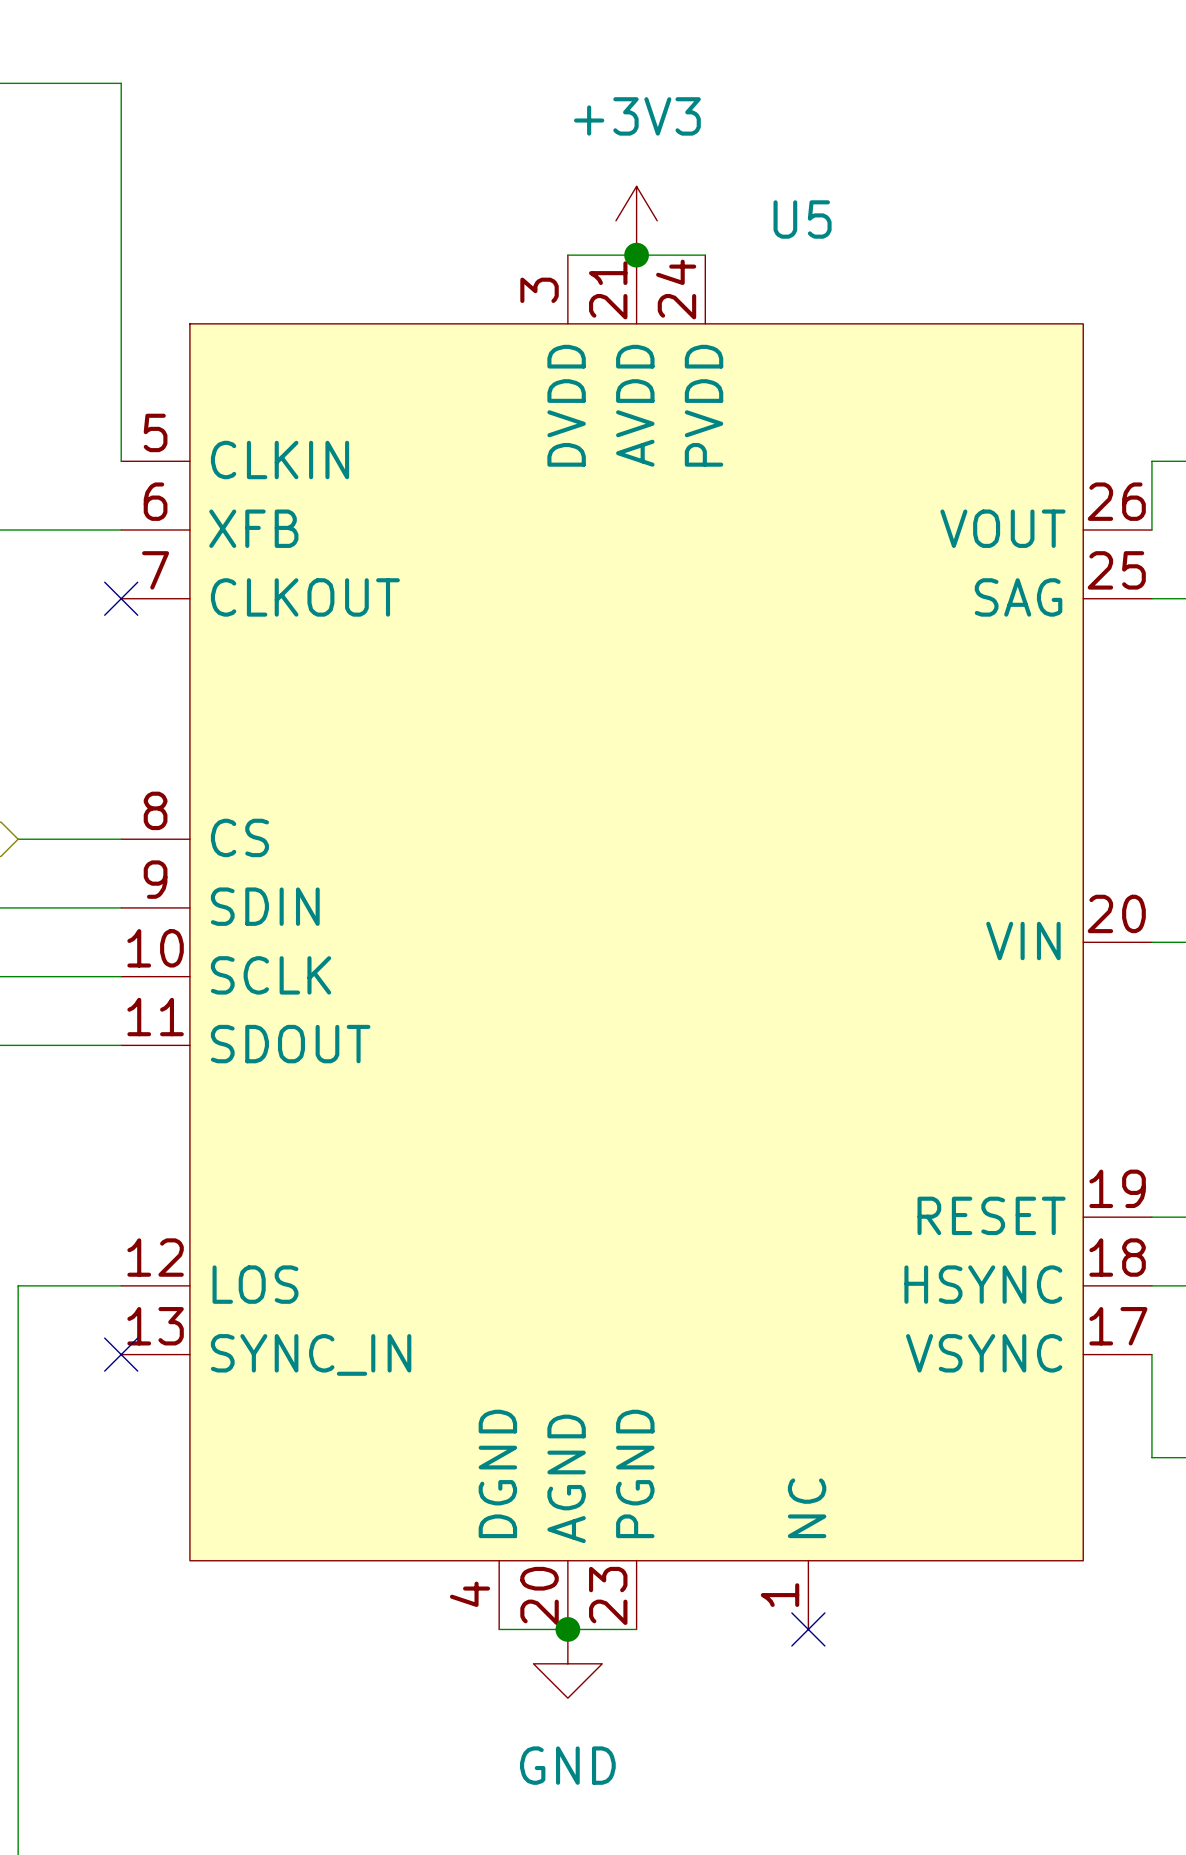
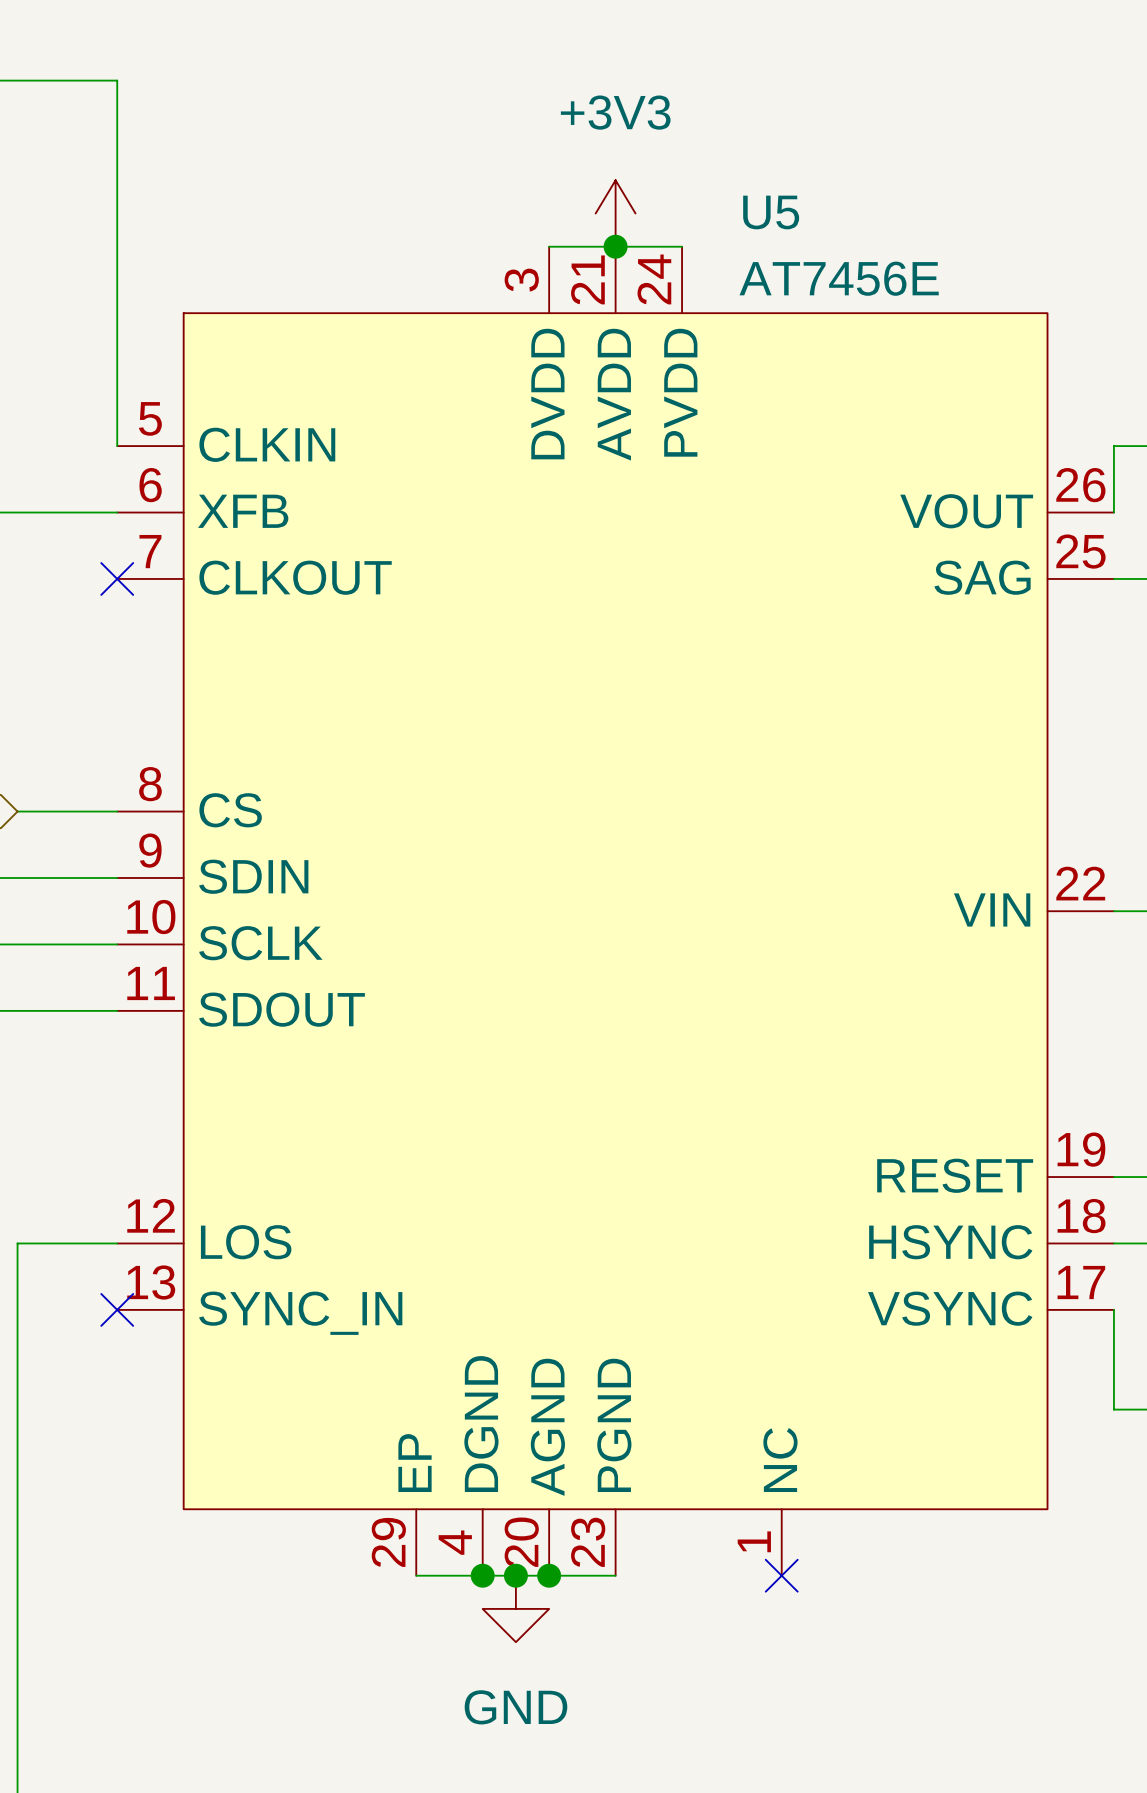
U5 symbol: [121, 255, 1152, 1630] -> [117, 246, 1114, 1576]
U5 value: none -> AT7456E (839, 278)
wire: none -> (416, 1575) (482, 1575)
junction: none -> (482, 1575)
junction: none -> (515, 1575)
power symbol position: GND (567, 1663) -> GND (515, 1608)

